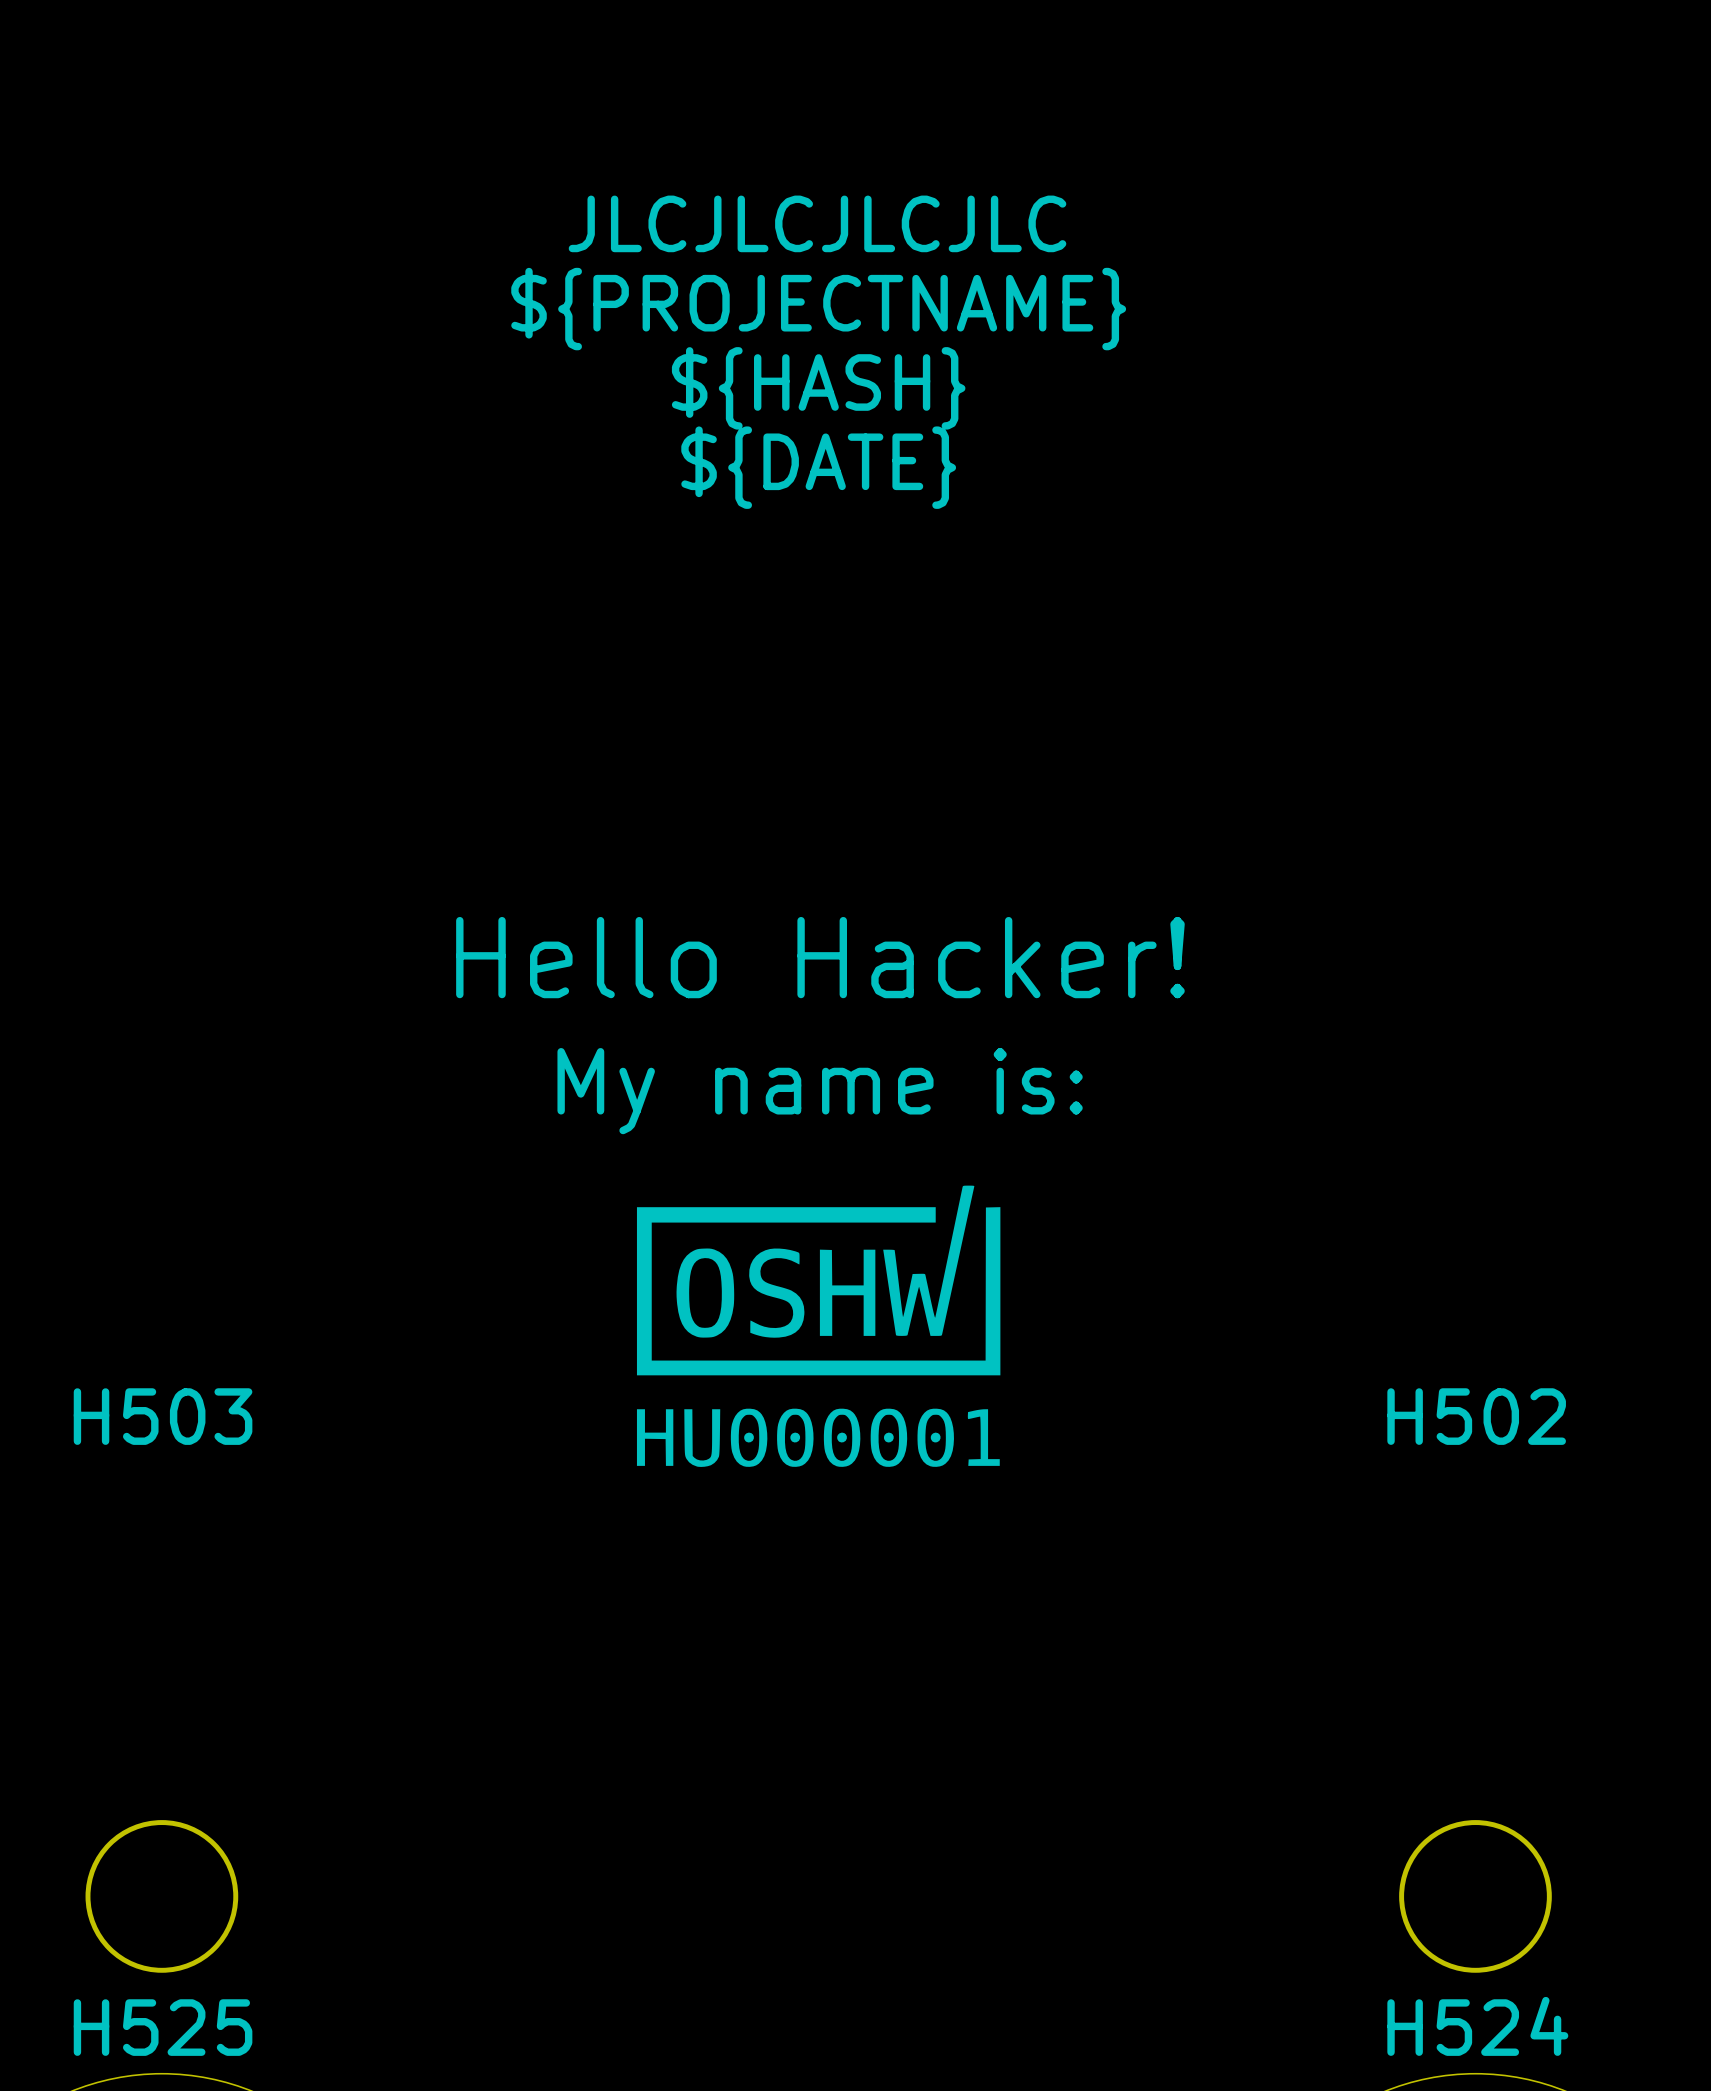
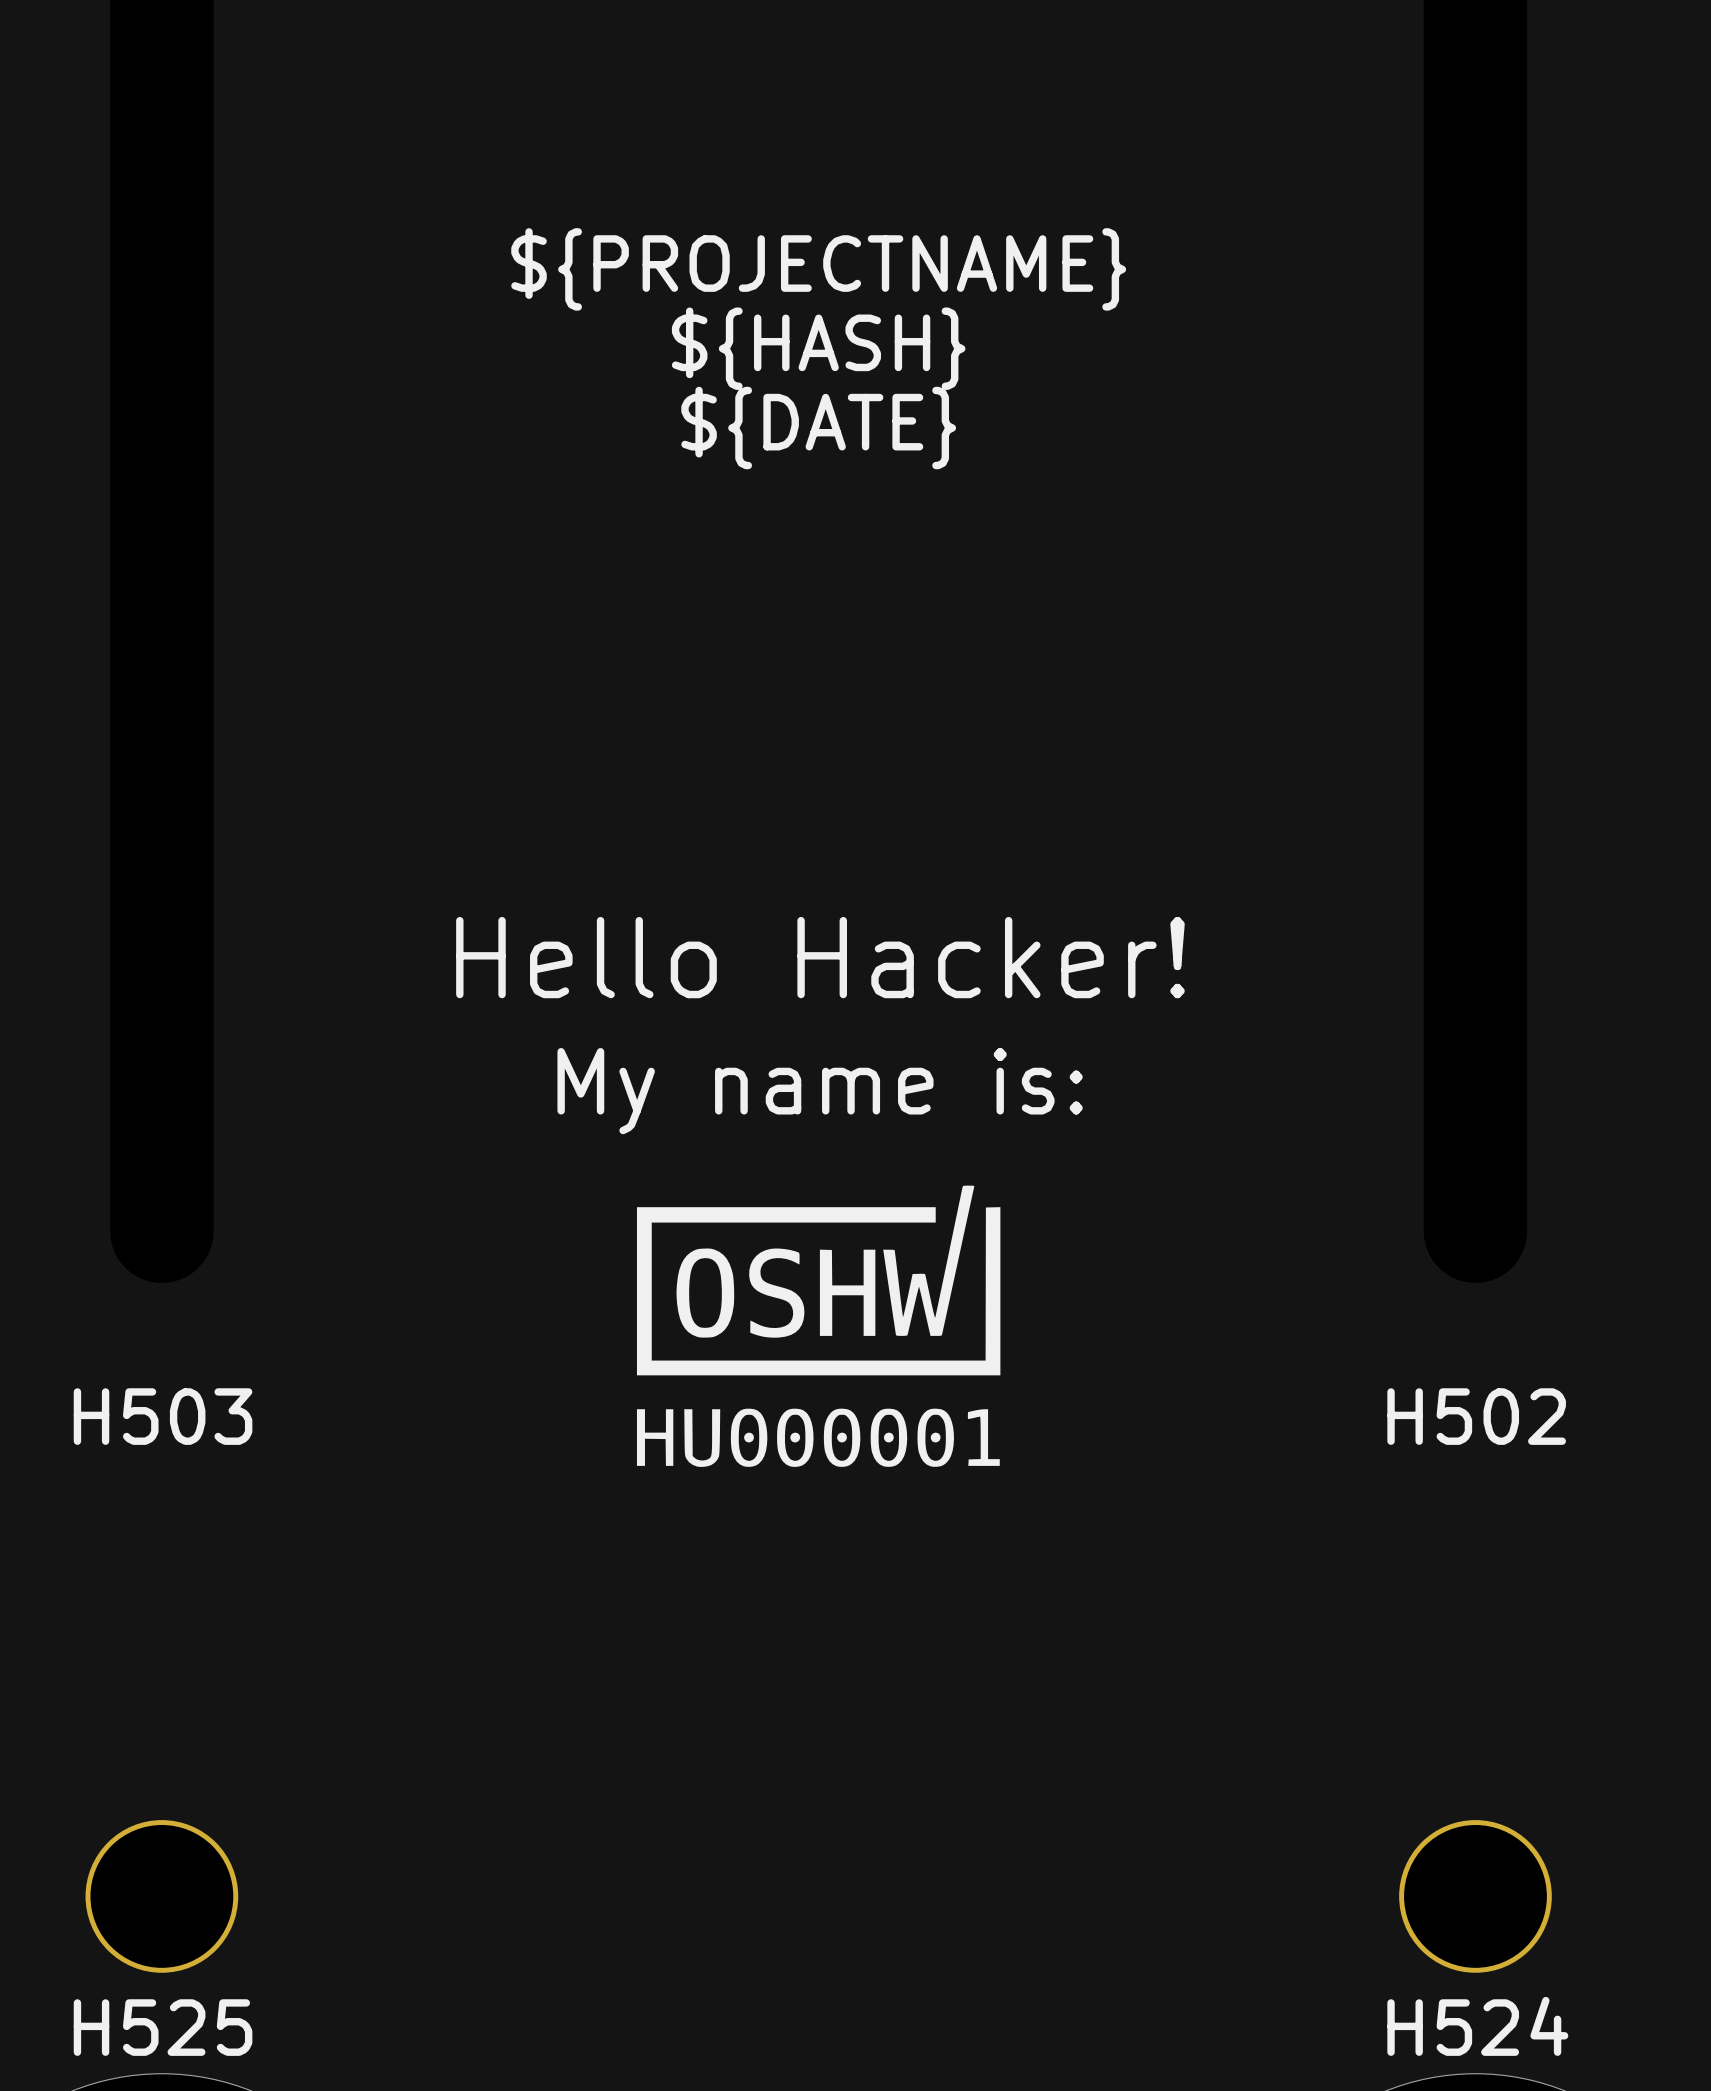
text: JLCJLCJLCJLC (817, 223) -> none
text position: ${PROJECTNAME} (818, 309) -> ${PROJECTNAME} (818, 269)
text position: ${HASH} (818, 388) -> ${HASH} (818, 348)
text position: ${DATE} (818, 467) -> ${DATE} (818, 428)

